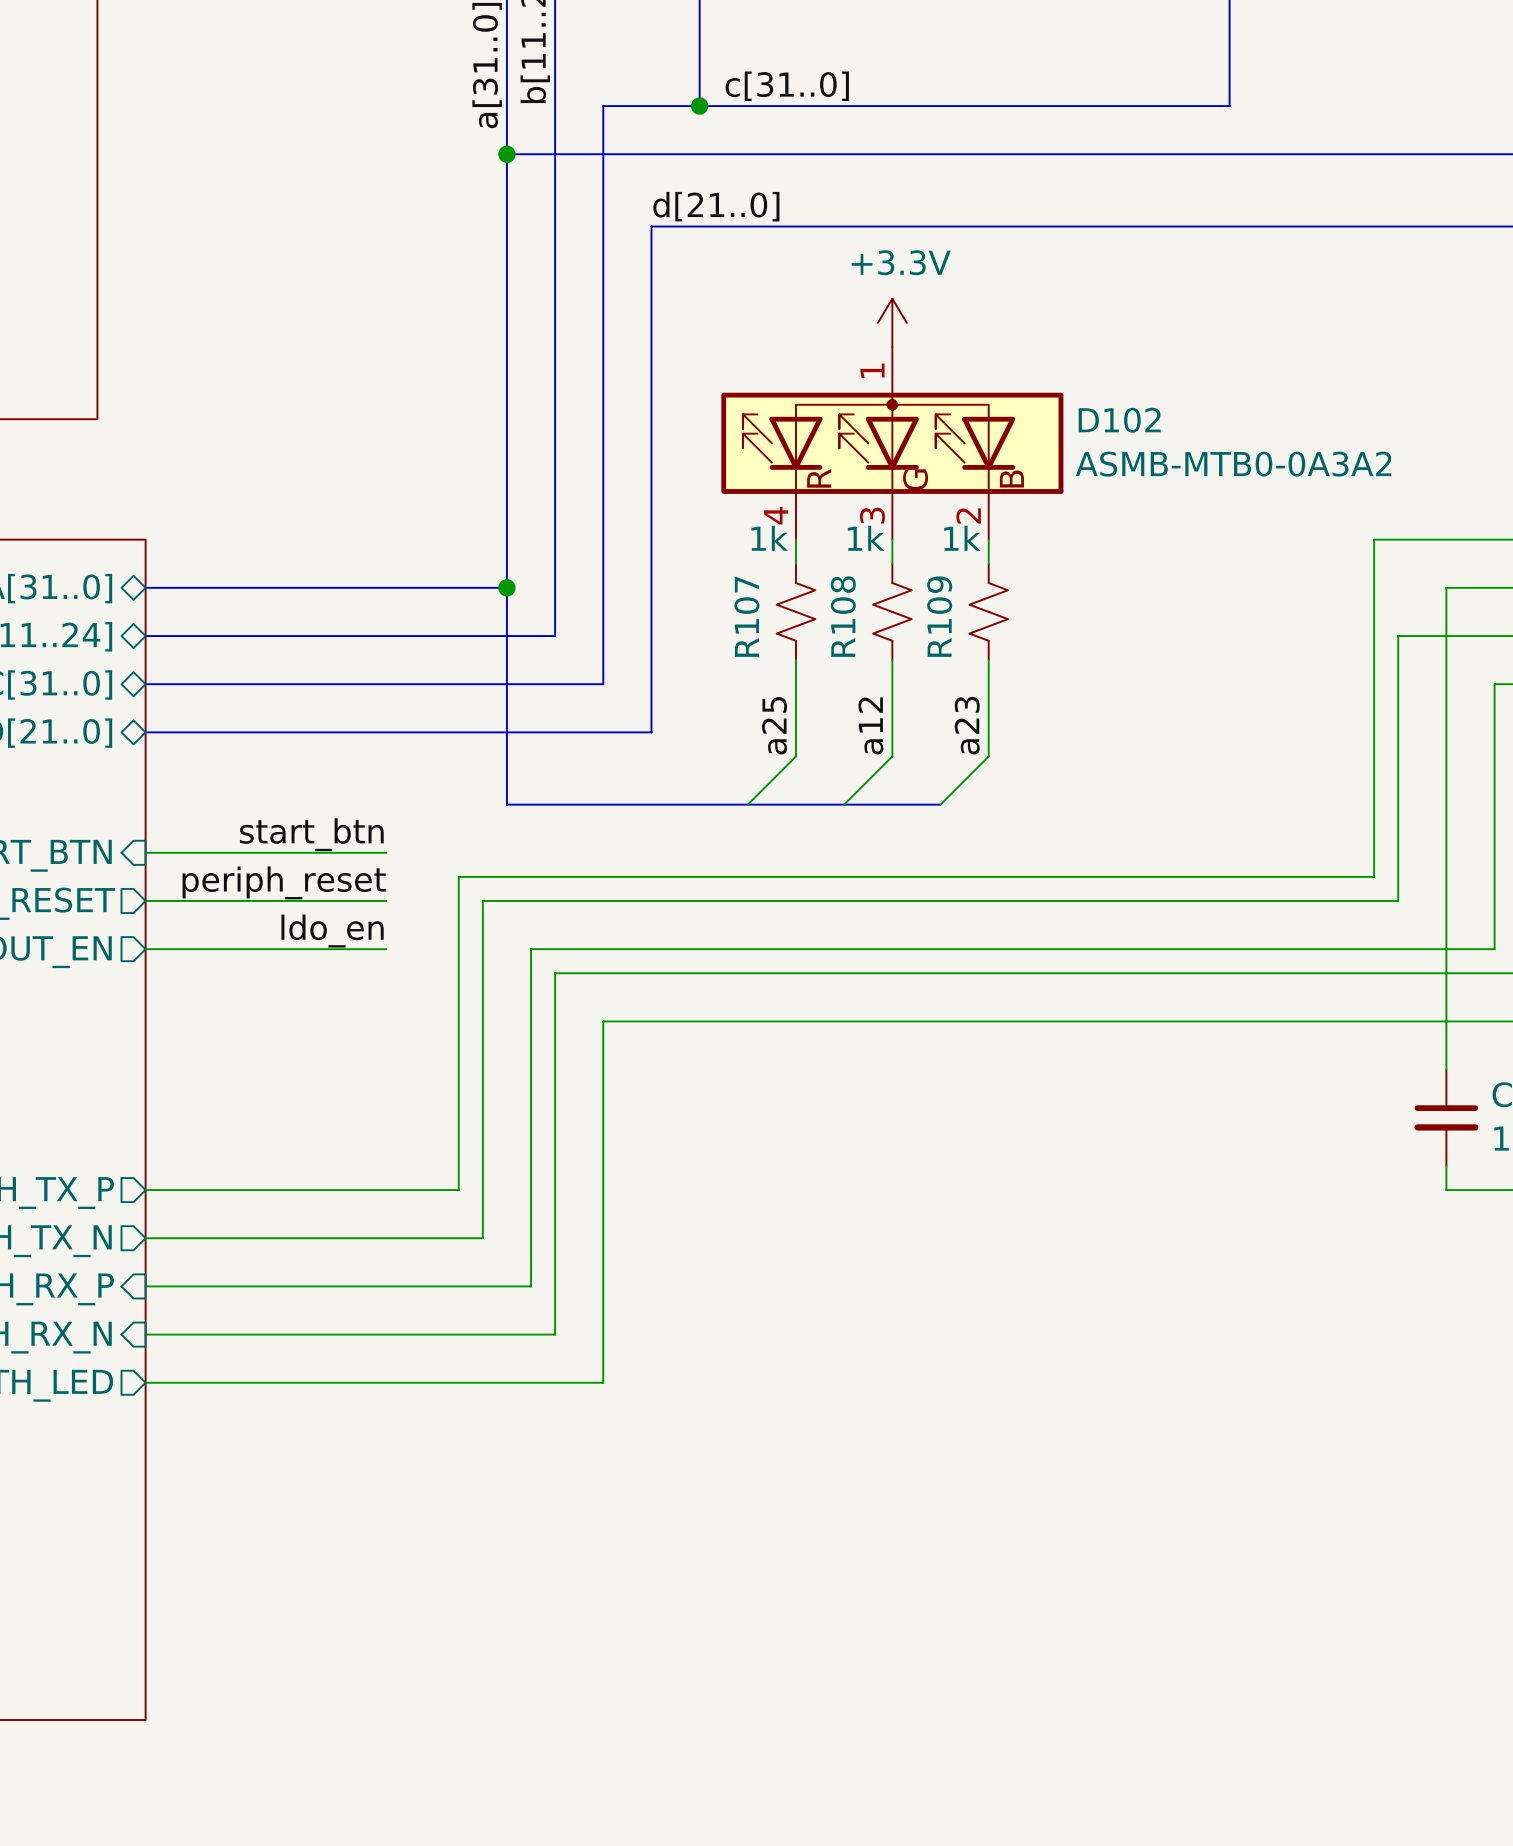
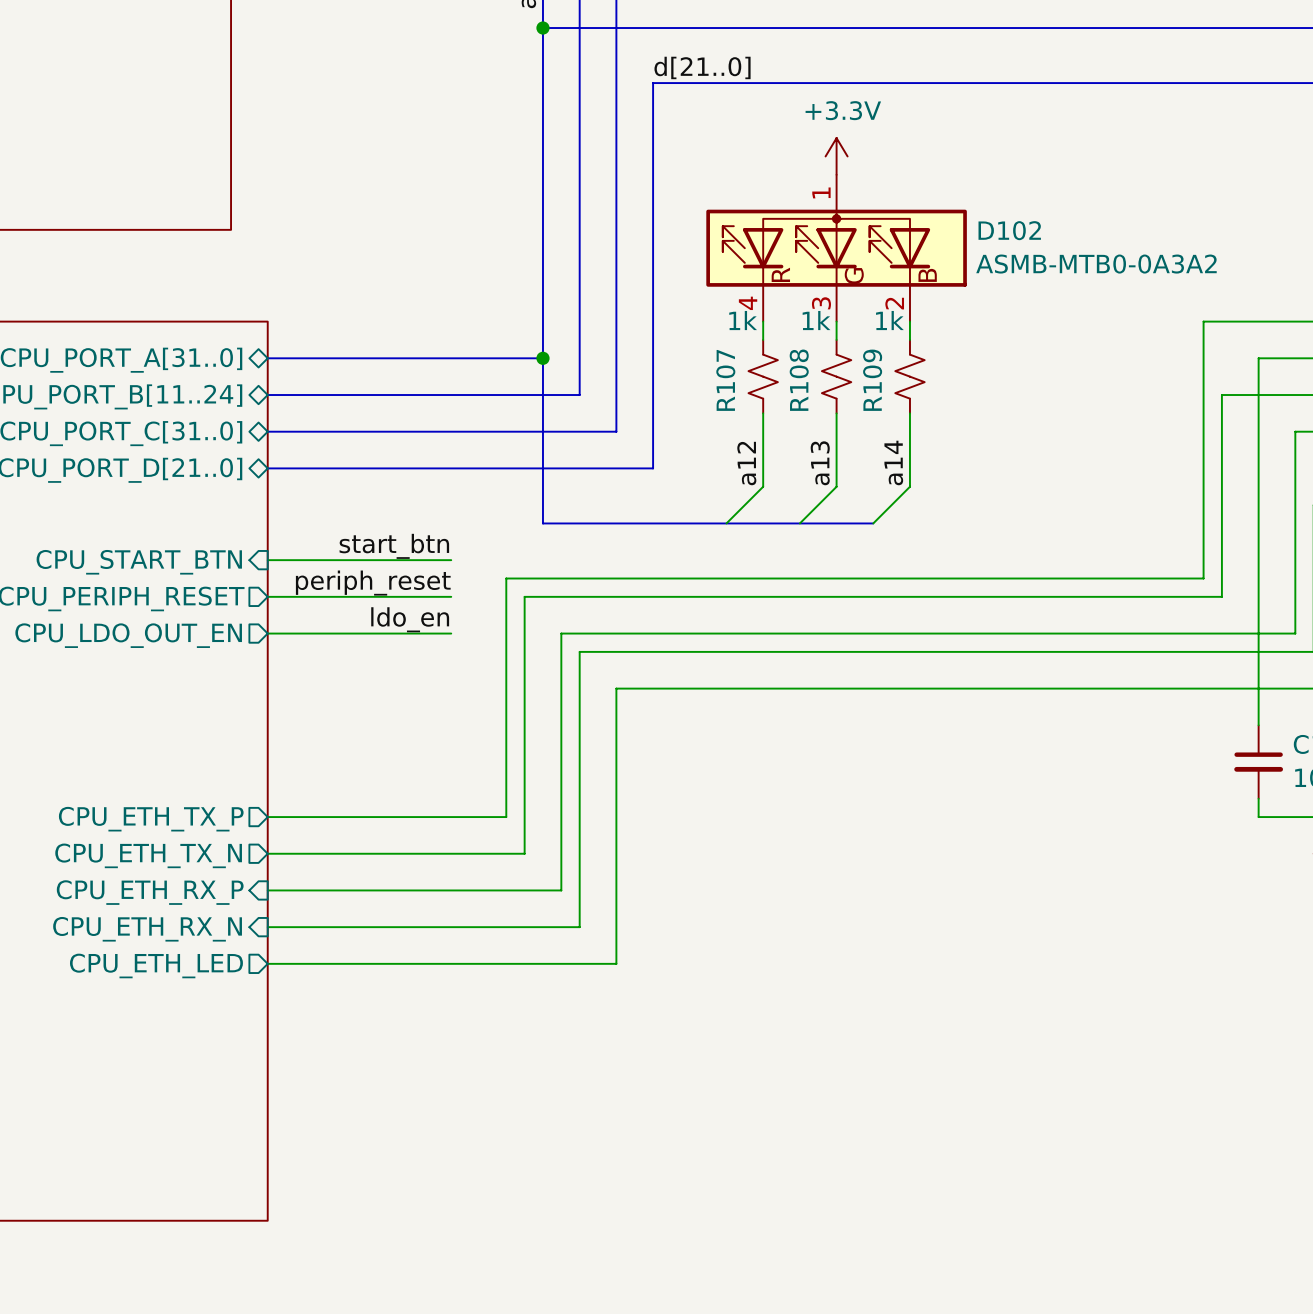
label: a25 (774, 725) -> a12 (746, 463)
label: a12 (870, 725) -> a13 (820, 463)
label: a23 (967, 725) -> a14 (893, 462)

